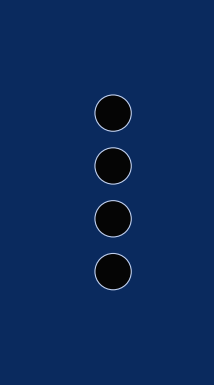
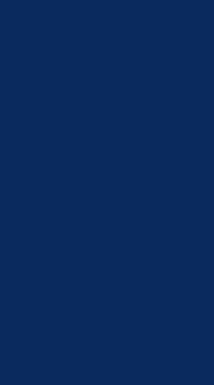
part: (113, 113) -> none
part: (113, 165) -> none
part: (113, 218) -> none
part: (113, 271) -> none

